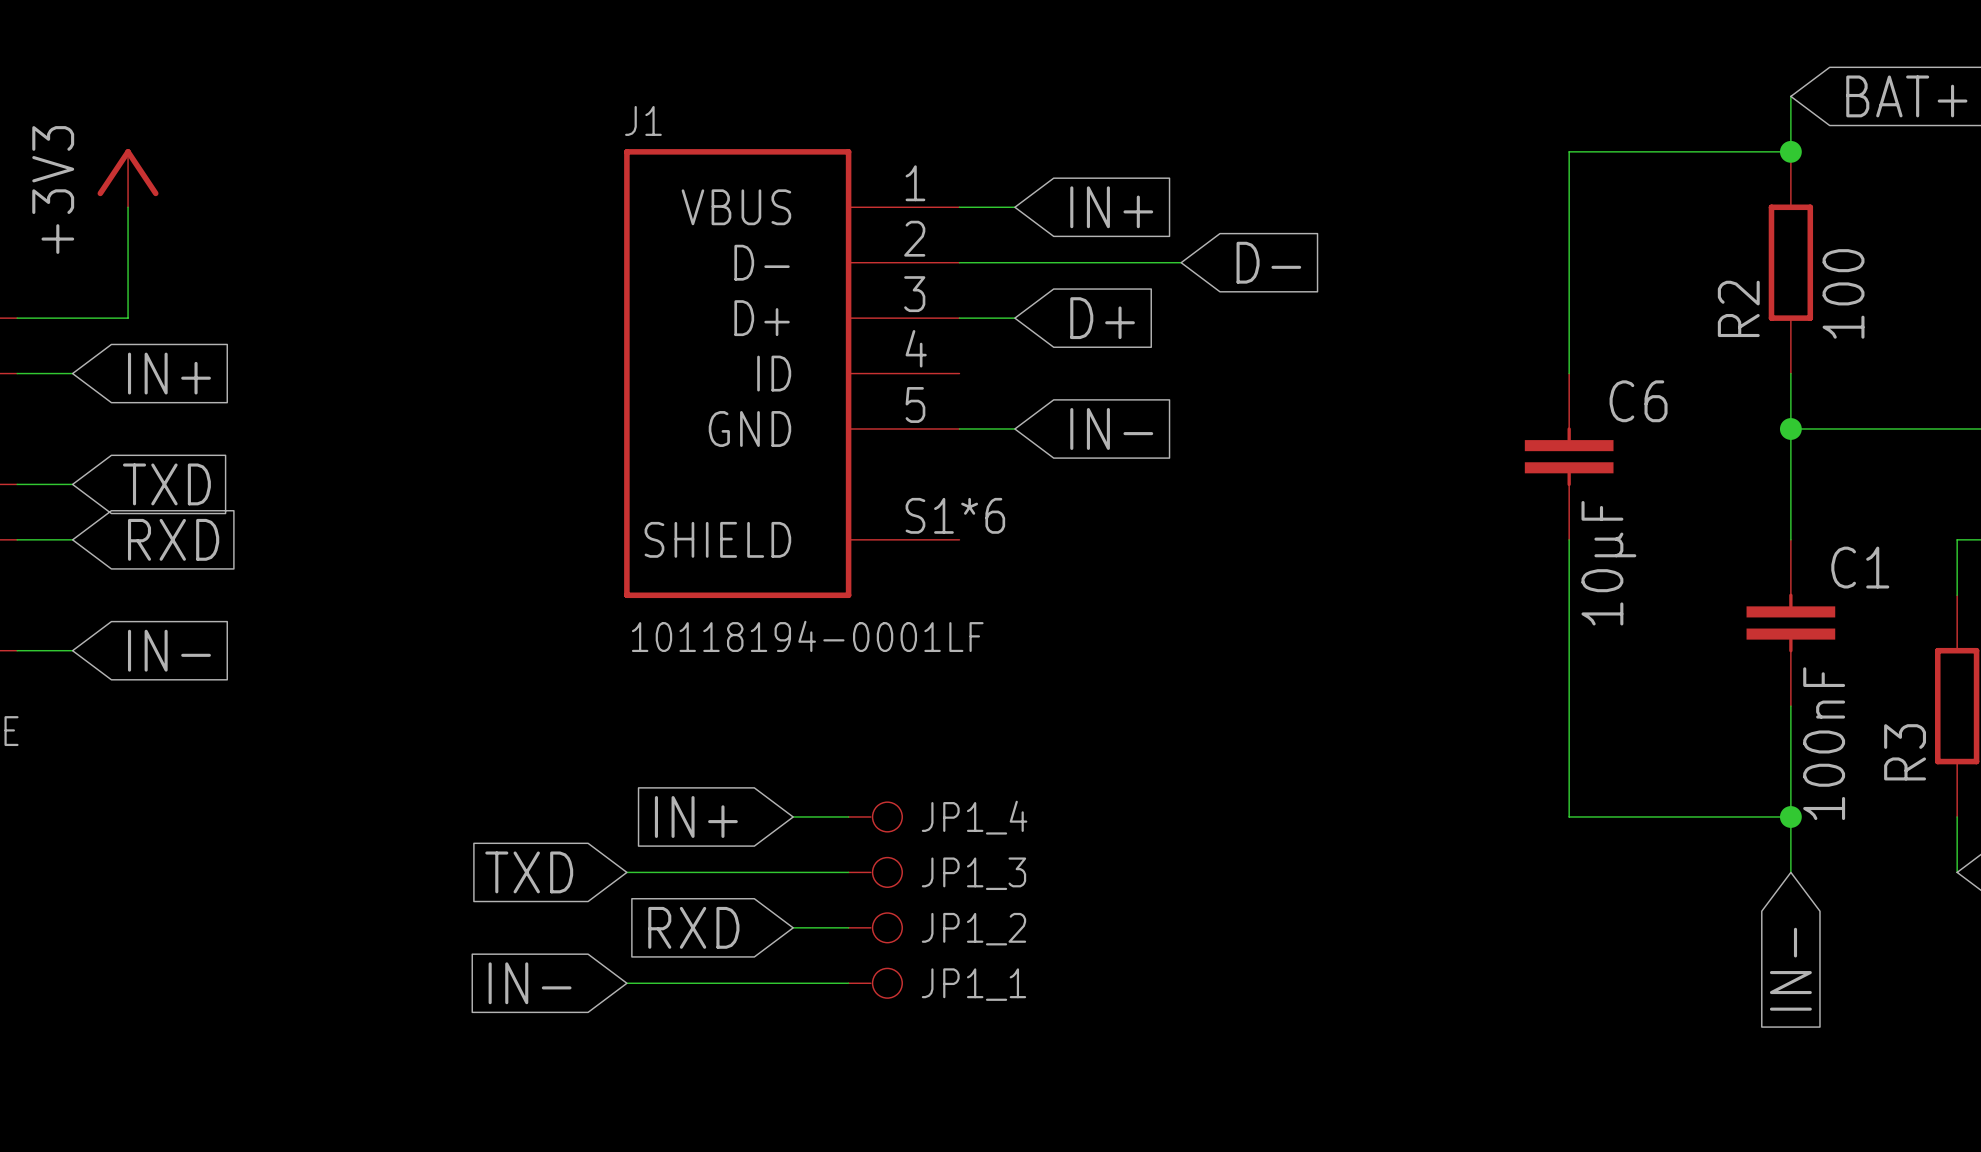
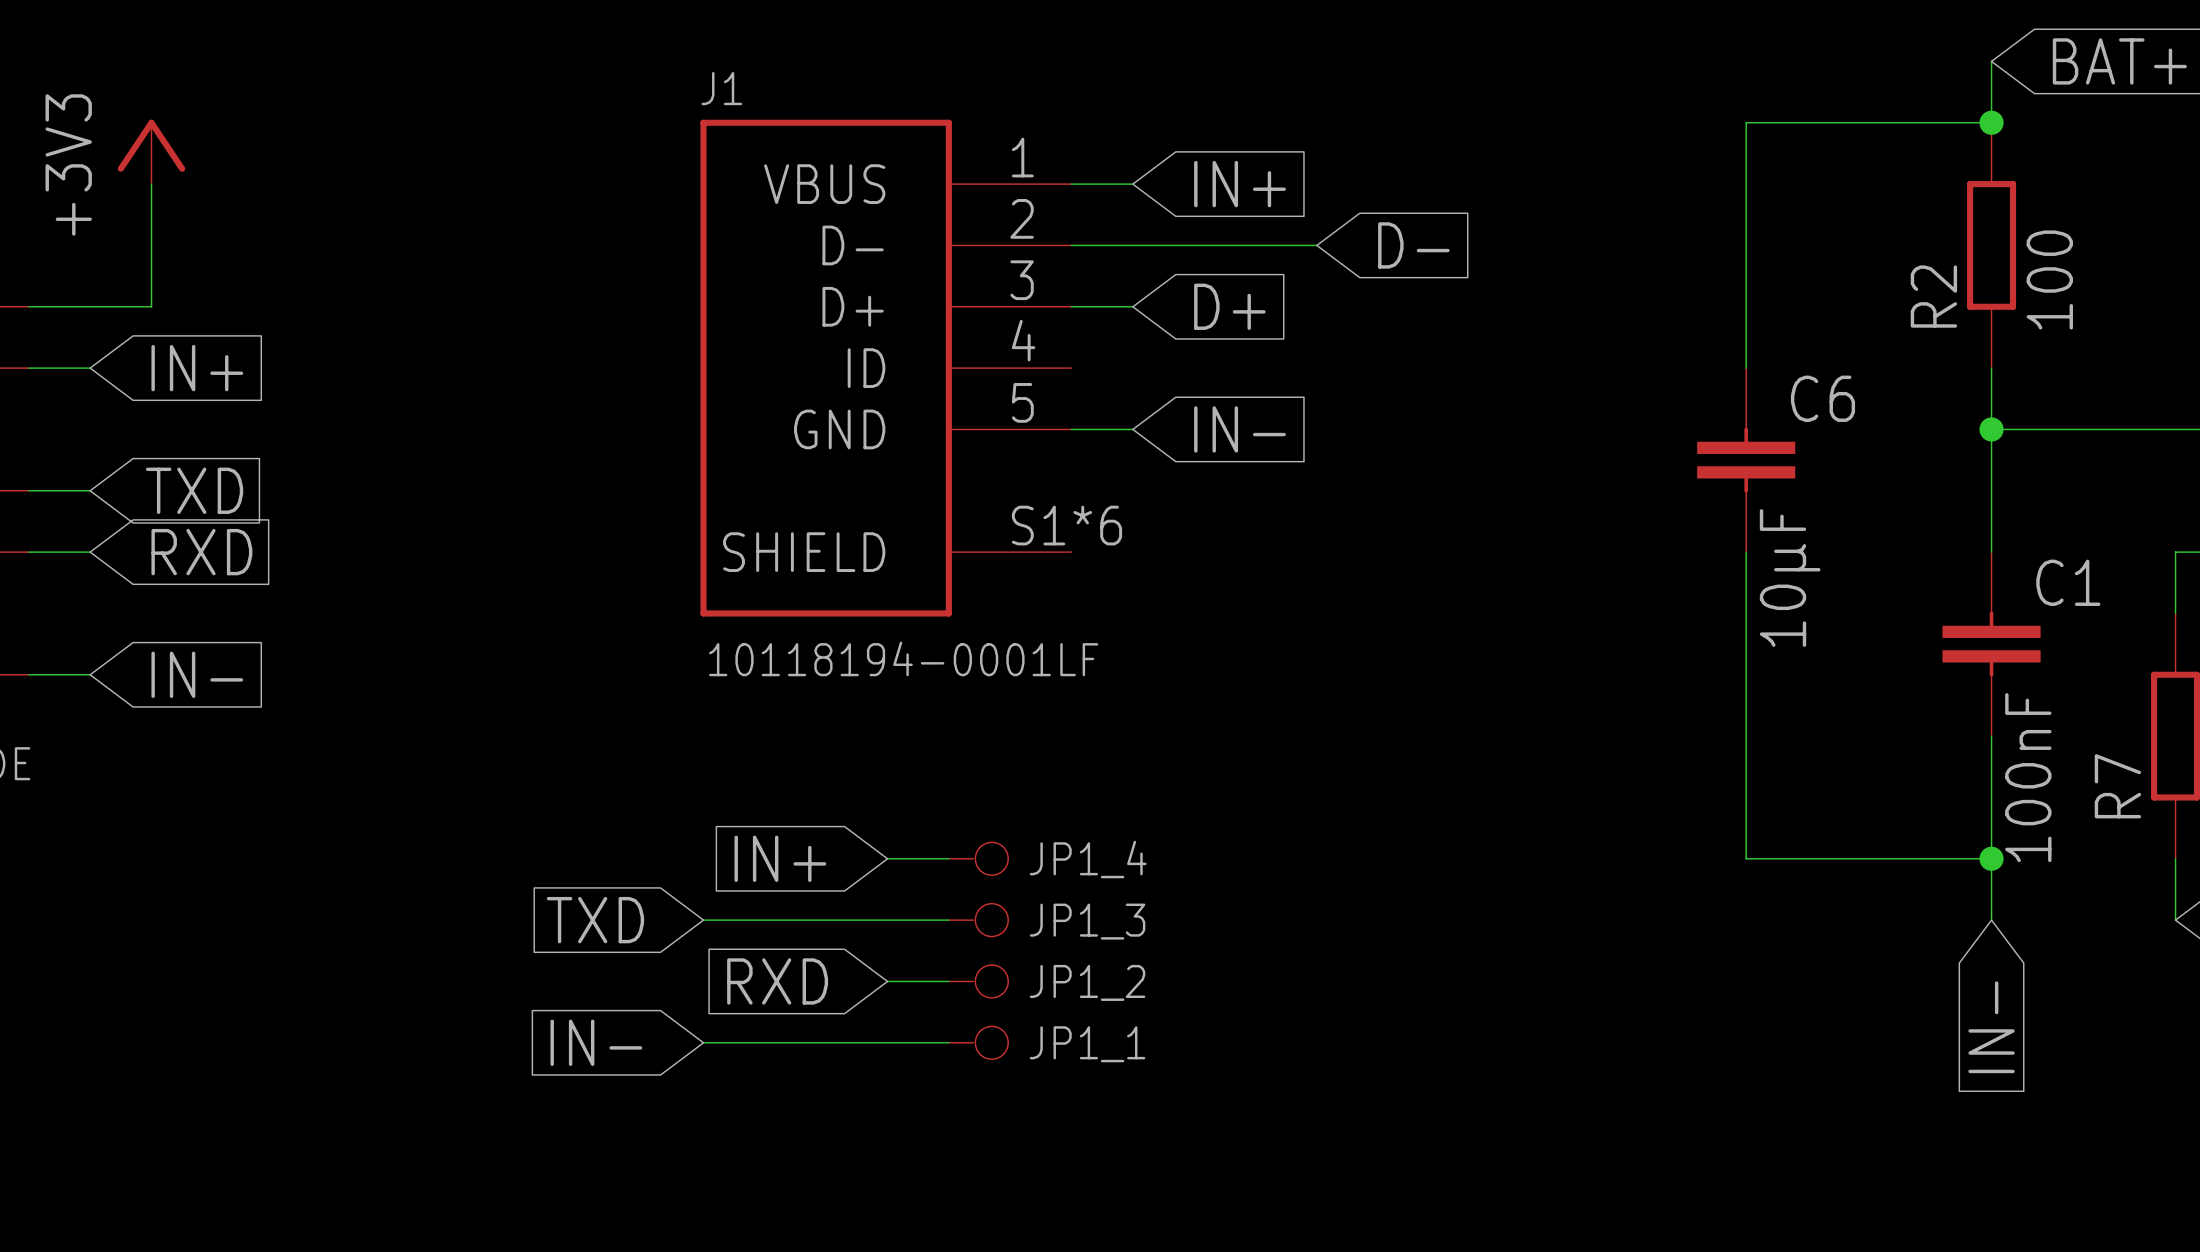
R3 name: R3 (1905, 752) -> R7 (2117, 786)

